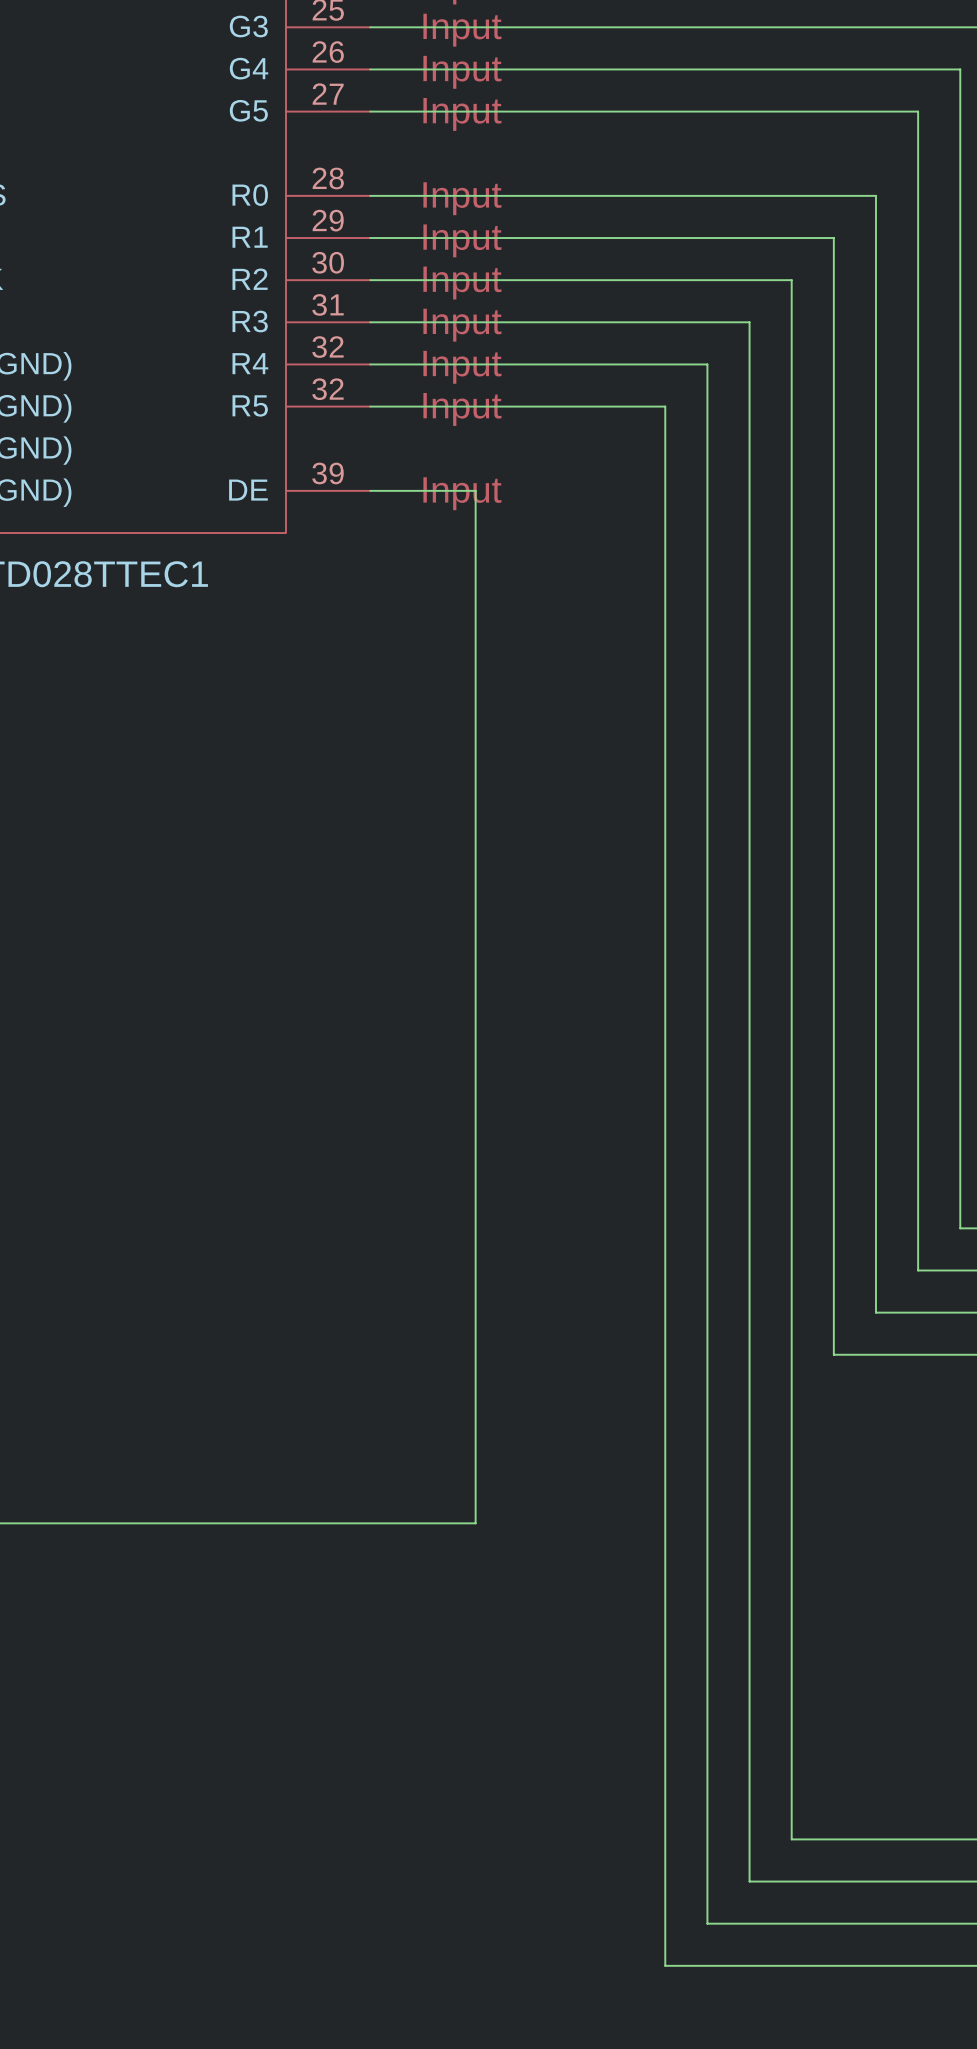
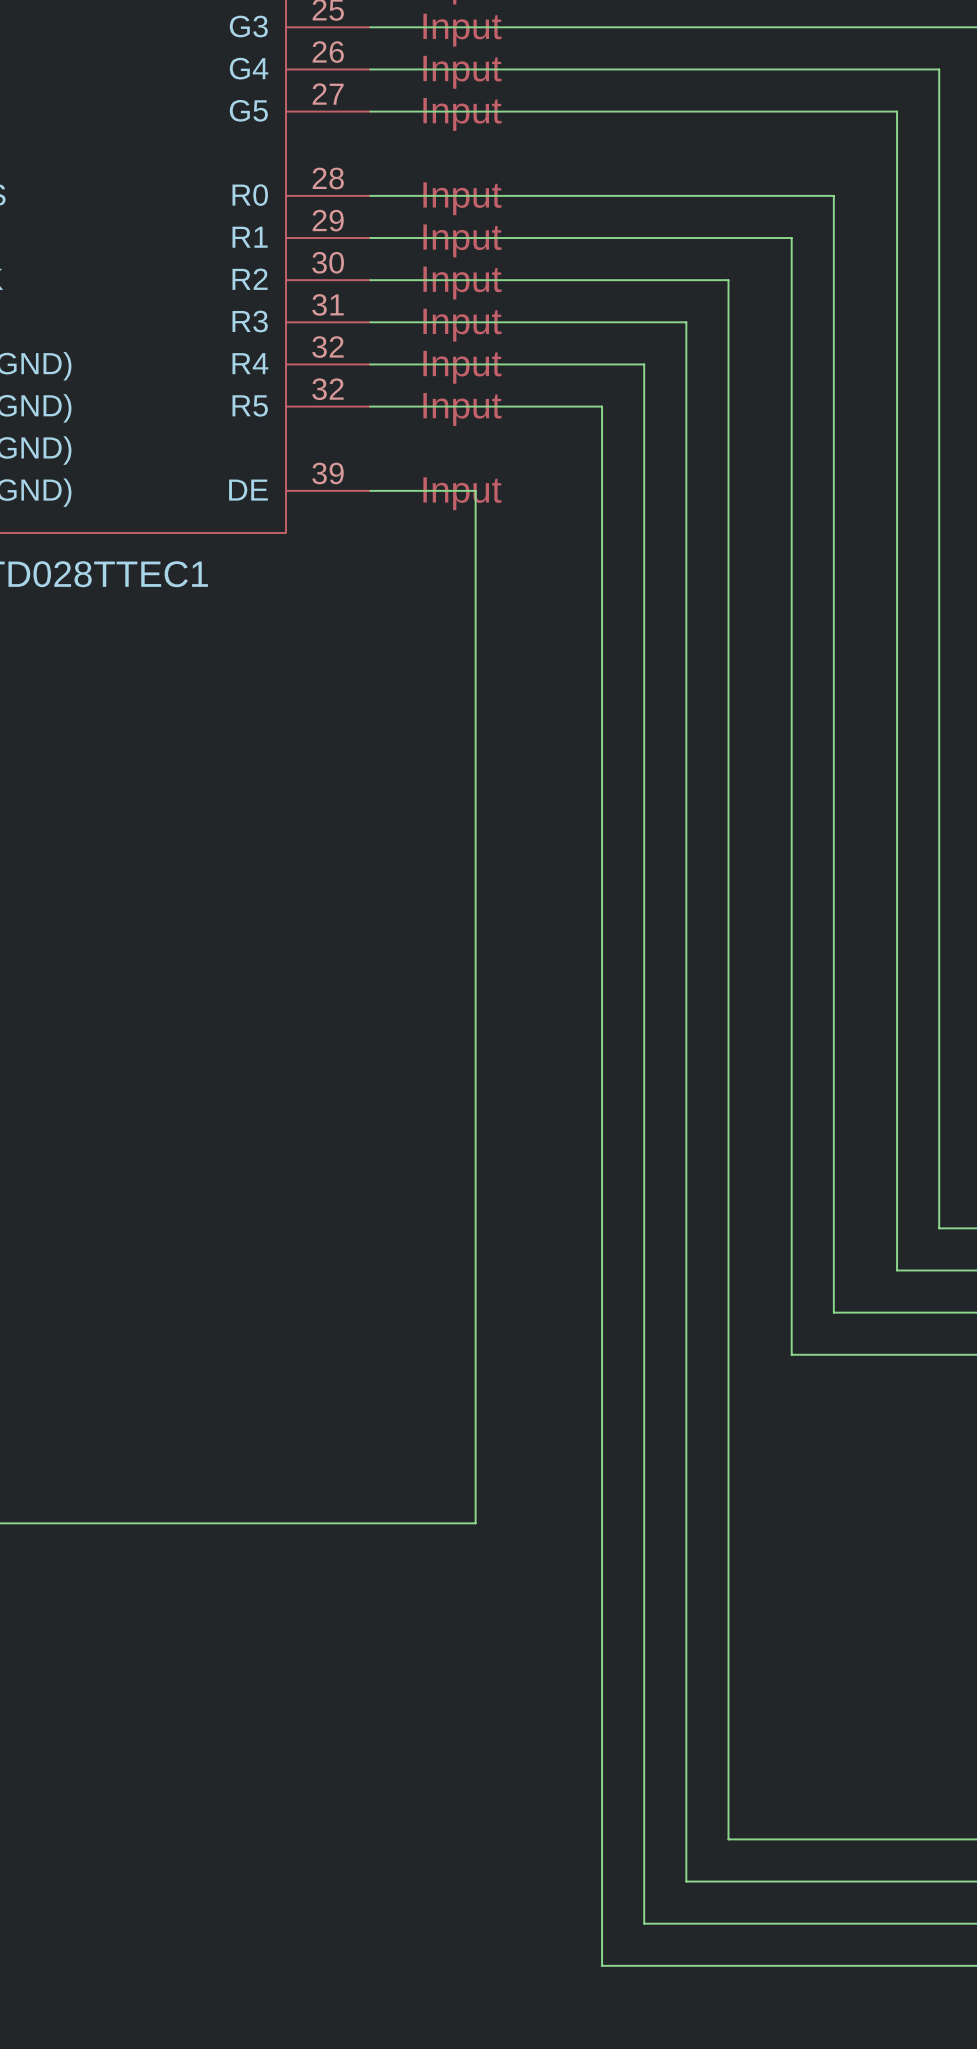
wire: (939, 69) (960, 69) (960, 1228) -> (939, 69) (939, 1228) (960, 1228)
wire: (897, 111) (918, 111) (918, 1270) -> (897, 111) (897, 1270) (918, 1270)
wire: (833, 195) (875, 195) (875, 1312) -> (833, 195) (833, 238)
wire: (791, 238) (833, 238) -> (791, 238) (791, 280)
wire: (728, 280) (791, 280) -> none
wire: (686, 322) (749, 322) (749, 1881) -> (686, 322) (686, 1881) (749, 1881)
wire: (644, 364) (707, 364) (707, 1923) -> (644, 364) (644, 1923) (707, 1923)
wire: (602, 406) (665, 406) (665, 1965) -> (602, 406) (602, 1965) (665, 1965)
wire: (833, 1312) (833, 1354) -> (791, 1354) (833, 1354)
wire: none -> (833, 1312) (875, 1312)
wire: (791, 1354) (791, 1839) -> (728, 280) (728, 1839) (791, 1839)

